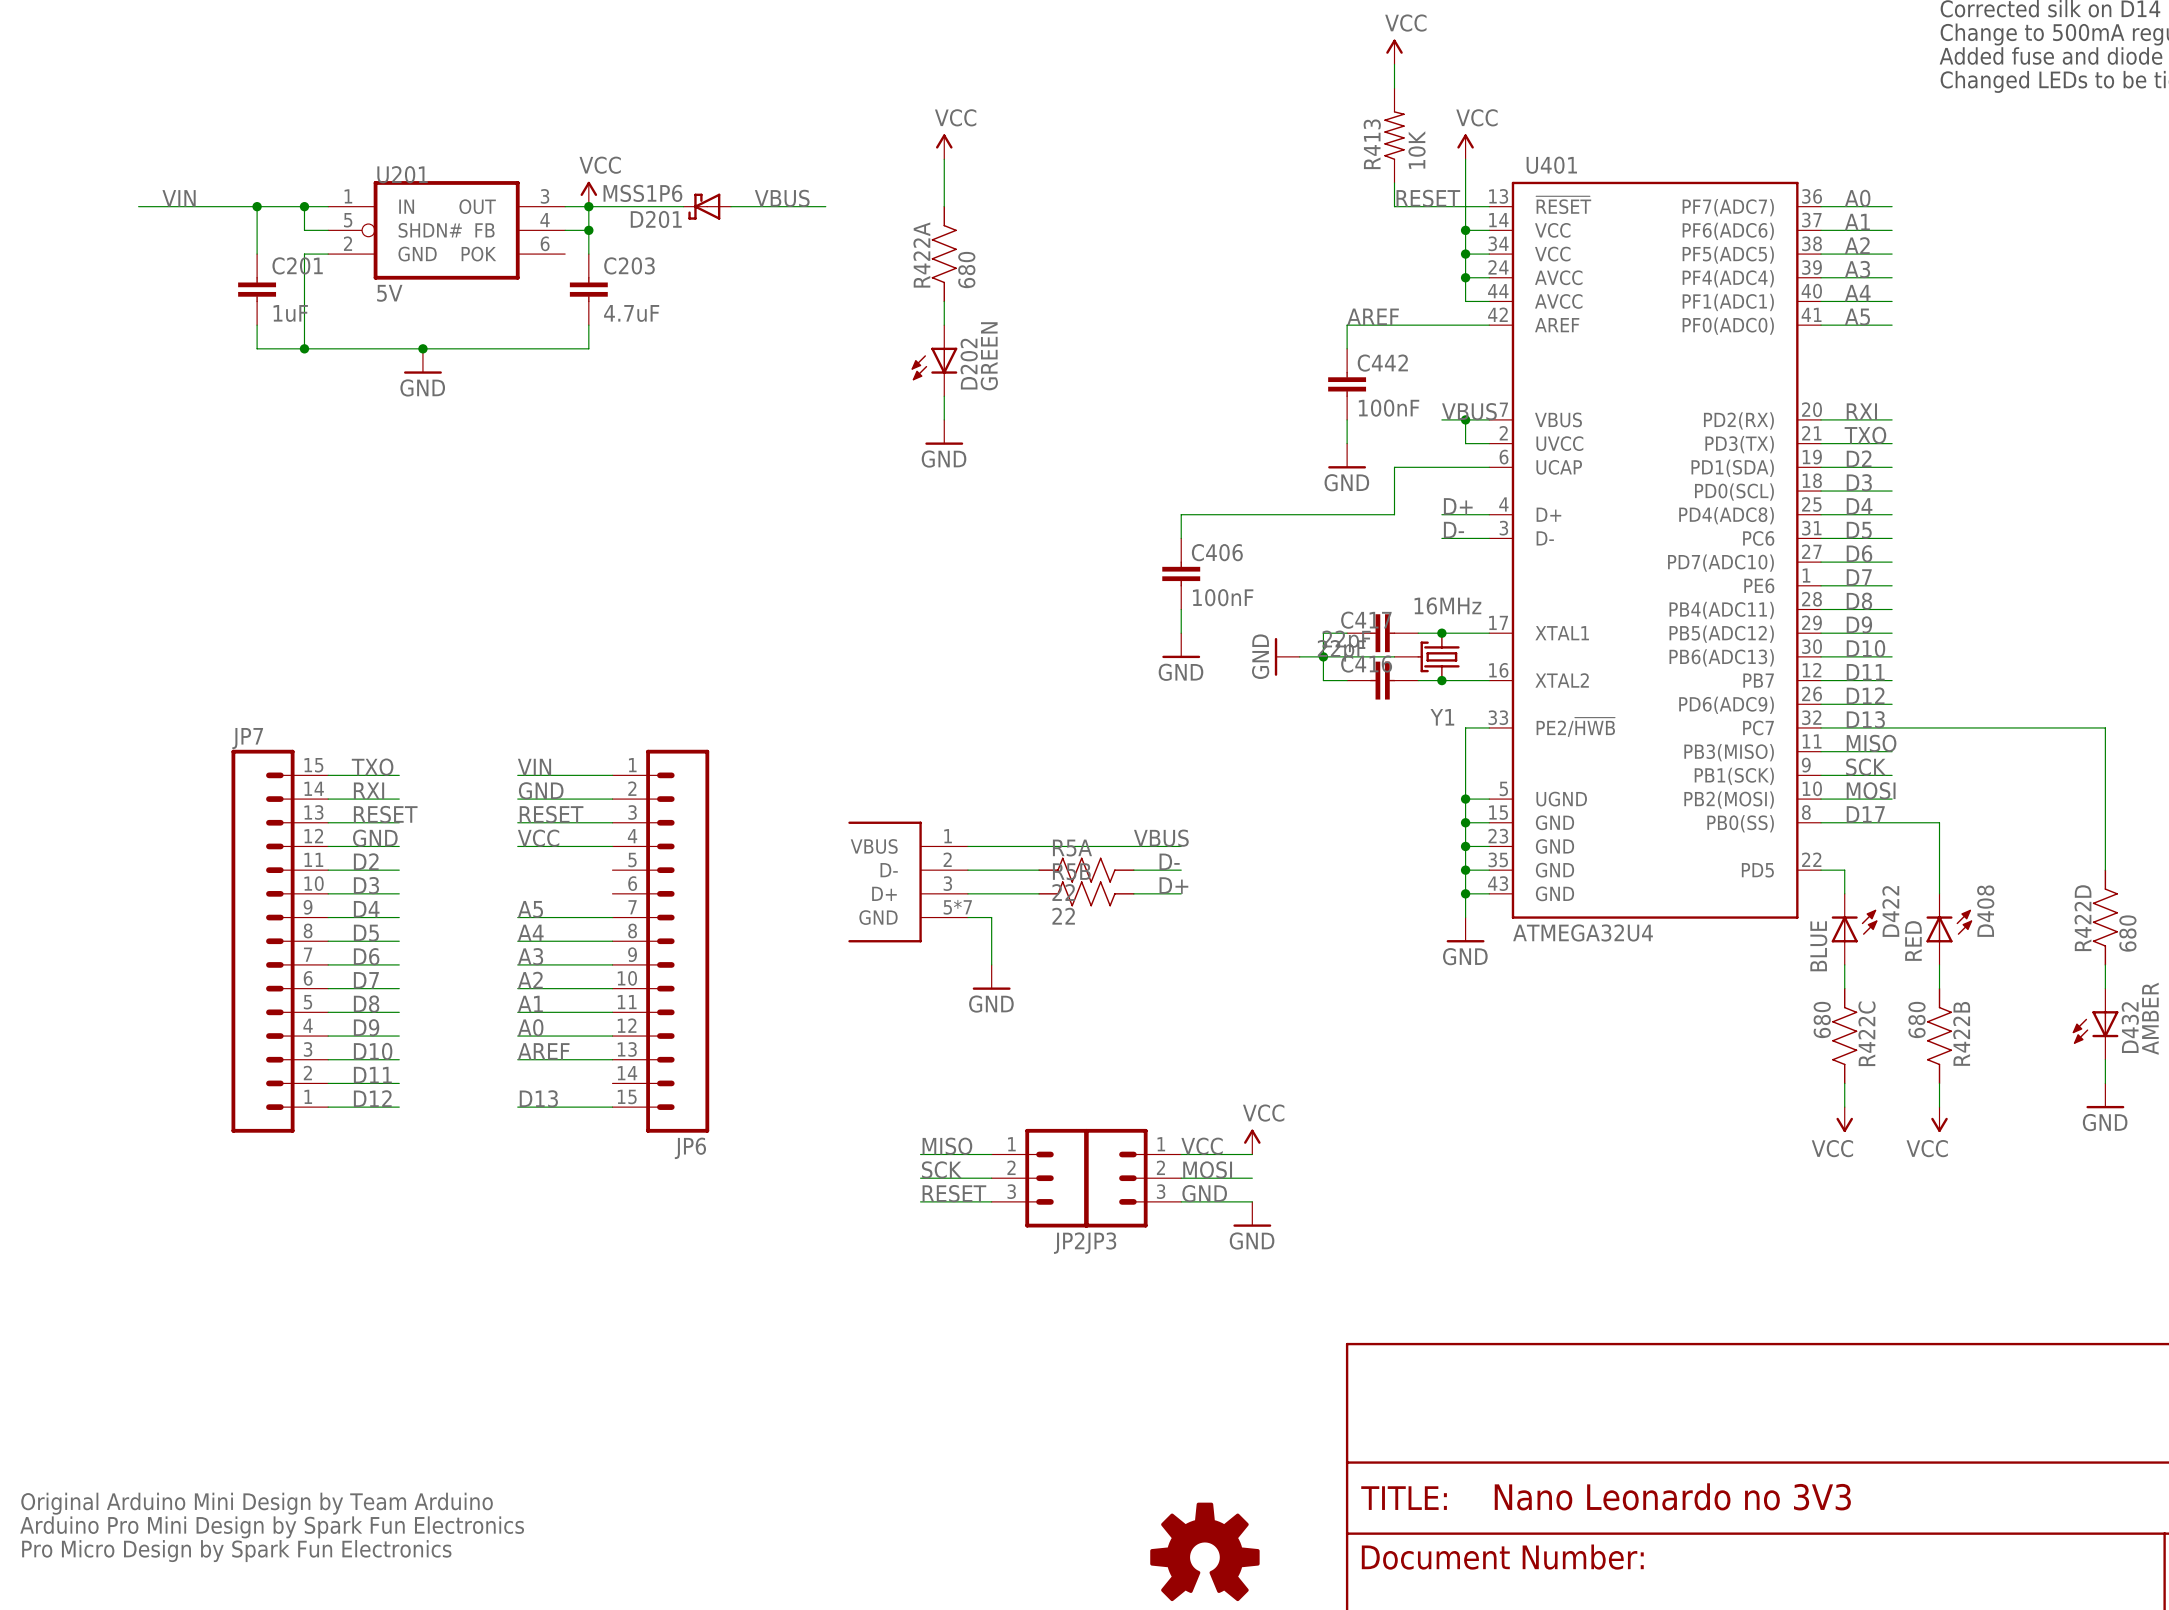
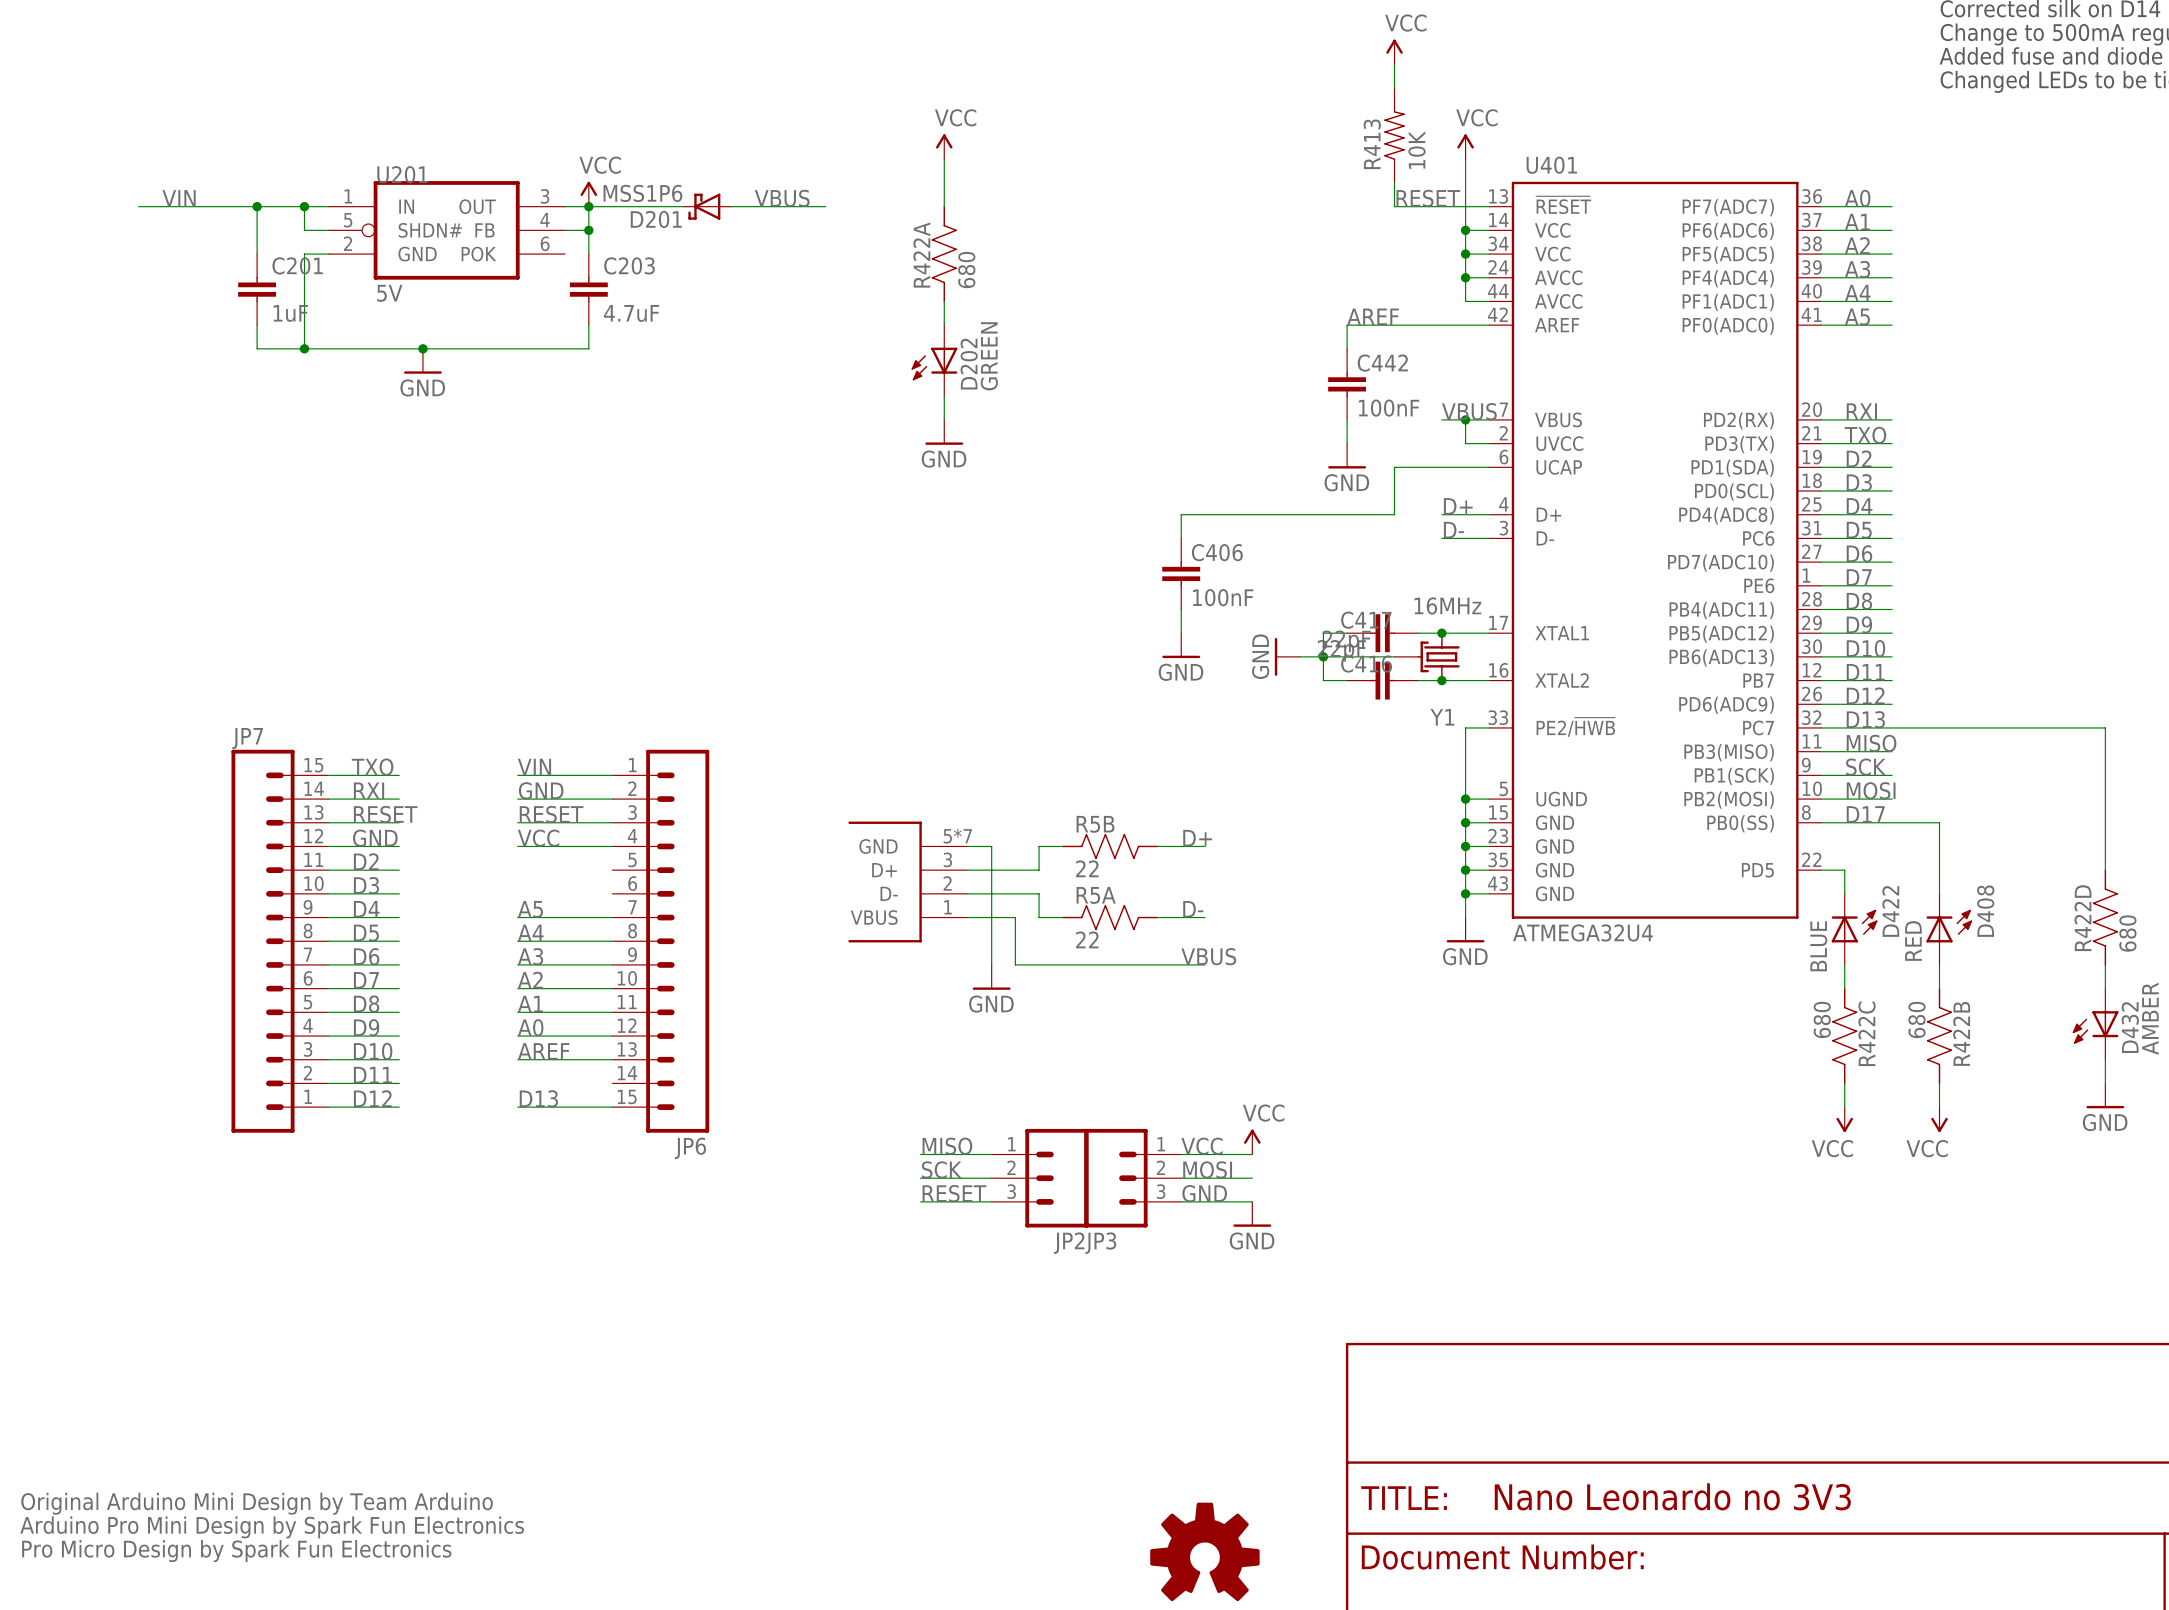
label position: VBUS (1161, 838) -> VBUS (1208, 956)
wire: (991, 846) (1039, 846) -> (1039, 870) (1039, 846)
wire: none -> (991, 846) (991, 917) (1015, 917) (1015, 964) (1204, 964)
wire: none -> (1181, 846) (1204, 846)
label position: D- (1169, 861) -> D- (1193, 909)
R5A position: (1086, 870) -> (1110, 917)
wire: (1133, 870) (1181, 870) -> none
part flip: as is (885, 882) -> up-down (885, 882)
label position: D+ (1173, 885) -> D+ (1197, 838)
wire: none -> (1039, 893) (1039, 917) (1062, 917)
R5B position: (1086, 893) -> (1110, 846)
wire: (1133, 893) (1181, 893) -> (1157, 917) (1204, 917)

